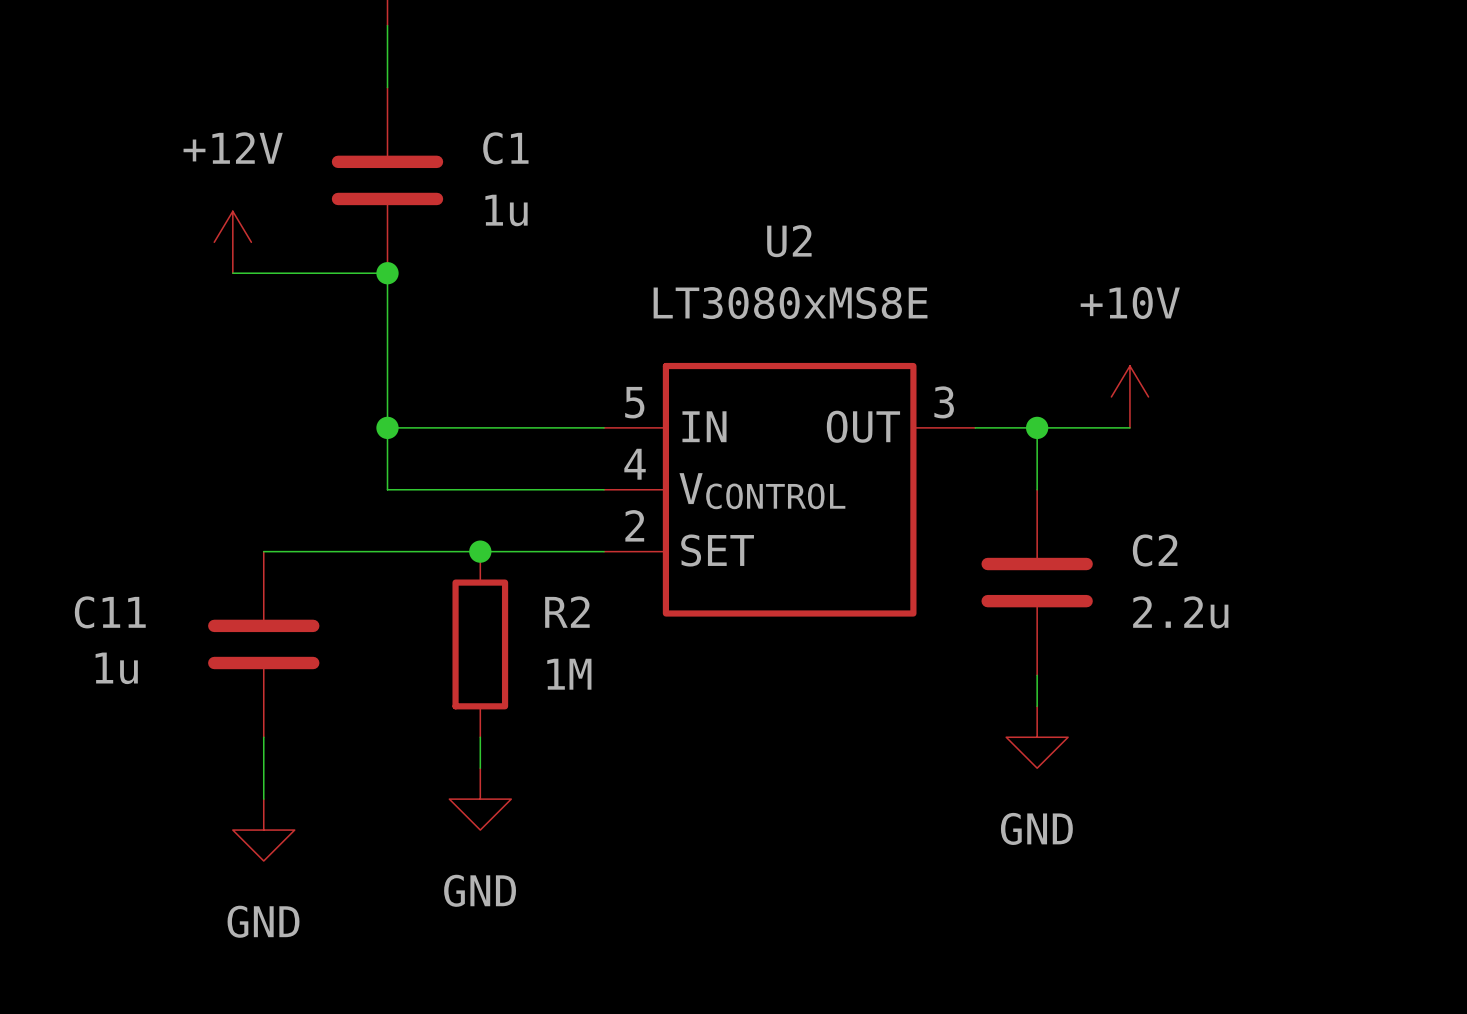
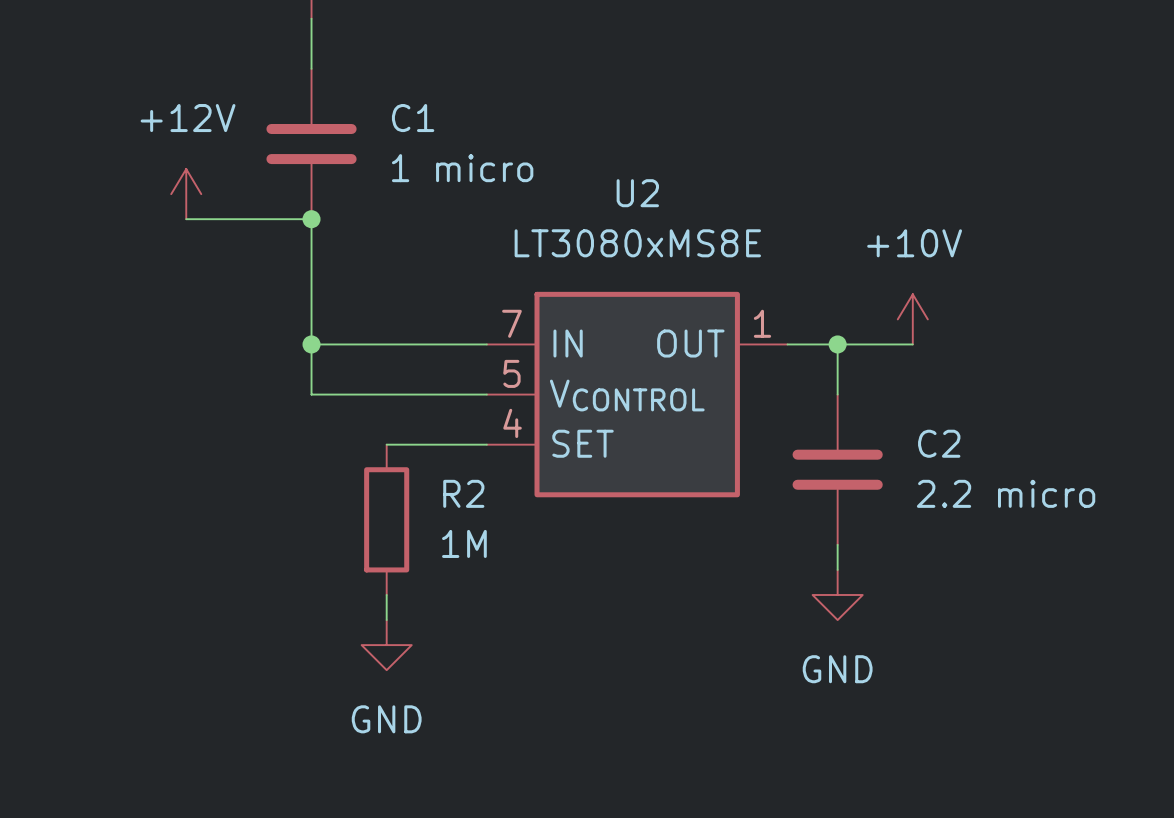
C1 value: 1u (506, 210) -> 1 micro (462, 168)
U2 pin number: 5 (634, 402) -> 7 (511, 323)
U2 pin number: 3 (944, 402) -> 1 (762, 323)
U2 pin number: 4 (635, 464) -> 5 (511, 373)
U2 pin number: 2 (634, 525) -> 4 (512, 423)
wire: (263, 551) (480, 551) -> none
junction: (480, 551) -> none
C2 value: 2.2u (1180, 612) -> 2.2 micro (1006, 493)
C11: 1u (263, 644) -> none
wire: (263, 737) (263, 799) -> none
power symbol: GND (263, 830) -> none

